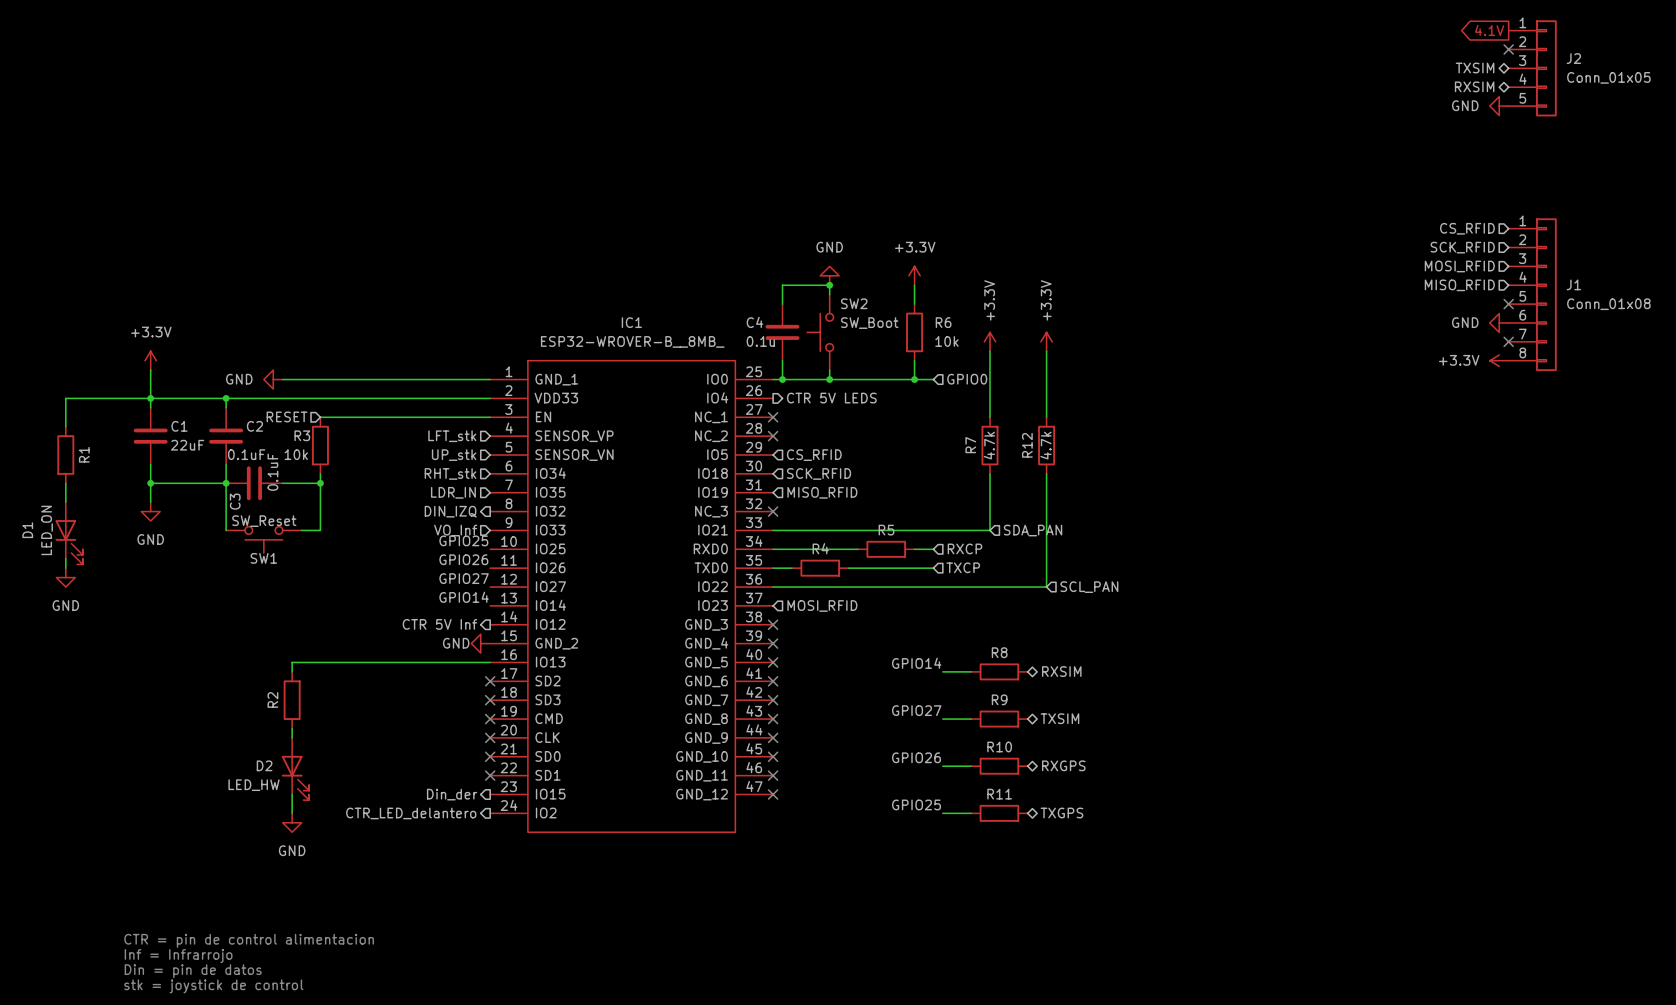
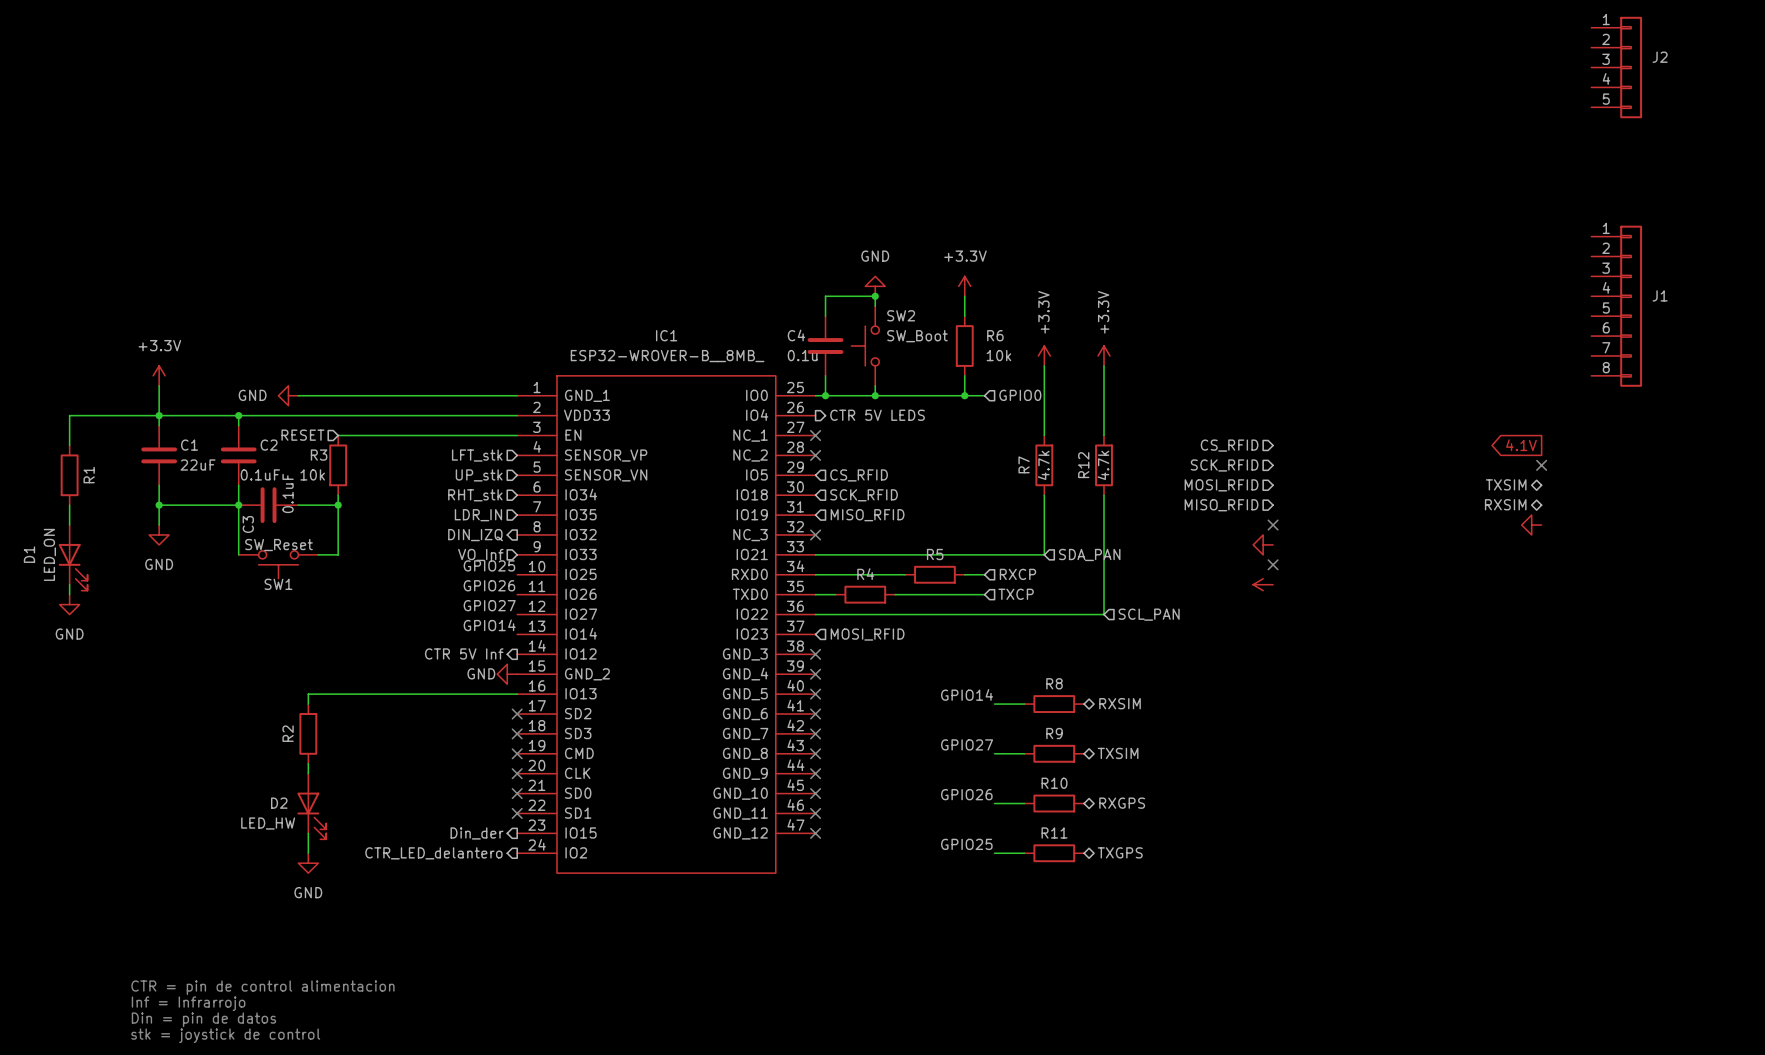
global label: 4.1V (1489, 30) -> none
no-connect mark: (1508, 49) -> none
hierarchical label: TXSIM (1475, 68) -> none
J2 value: Conn_01x05 (1608, 77) -> none
hierarchical label: RXSIM (1474, 86) -> none
power symbol: GND (1499, 106) -> none
hierarchical label: CS_RFID (1467, 228) -> none
hierarchical label: SCK_RFID (1462, 247) -> none
hierarchical label: MOSI_RFID (1459, 266) -> none
hierarchical label: MISO_RFID (1459, 285) -> none
no-connect mark: (1508, 304) -> none
J1 value: Conn_01x08 (1608, 304) -> none
power symbol: GND (1499, 322) -> none
no-connect mark: (1508, 341) -> none
power symbol: +3.3V (1499, 360) -> none
hierarchical label: none -> CS_RFID (1229, 445)
global label: none -> 4.1V (1521, 445)
hierarchical label: none -> SCK_RFID (1224, 465)
no-connect mark: none -> (1541, 465)
hierarchical label: none -> MOSI_RFID (1221, 485)
hierarchical label: none -> TXSIM (1506, 484)
hierarchical label: none -> RXSIM (1505, 504)
hierarchical label: none -> MISO_RFID (1221, 505)
no-connect mark: none -> (1273, 525)
power symbol: none -> (1531, 525)
power symbol: none -> (1263, 544)
no-connect mark: none -> (1273, 564)
power symbol: none -> (1263, 584)

